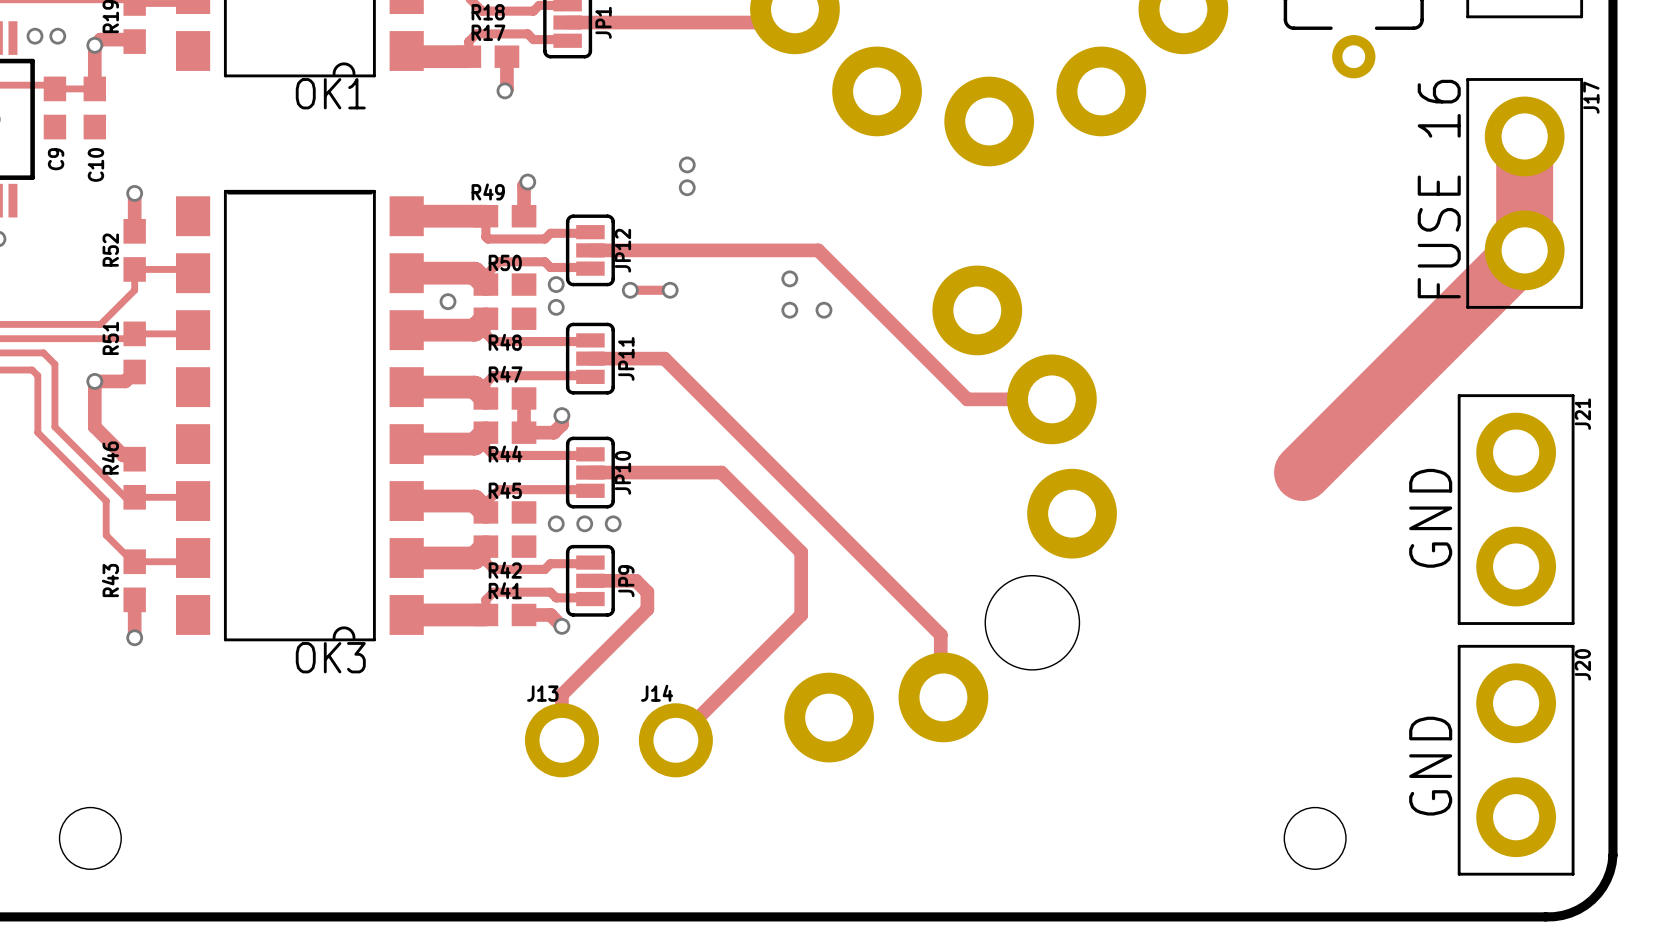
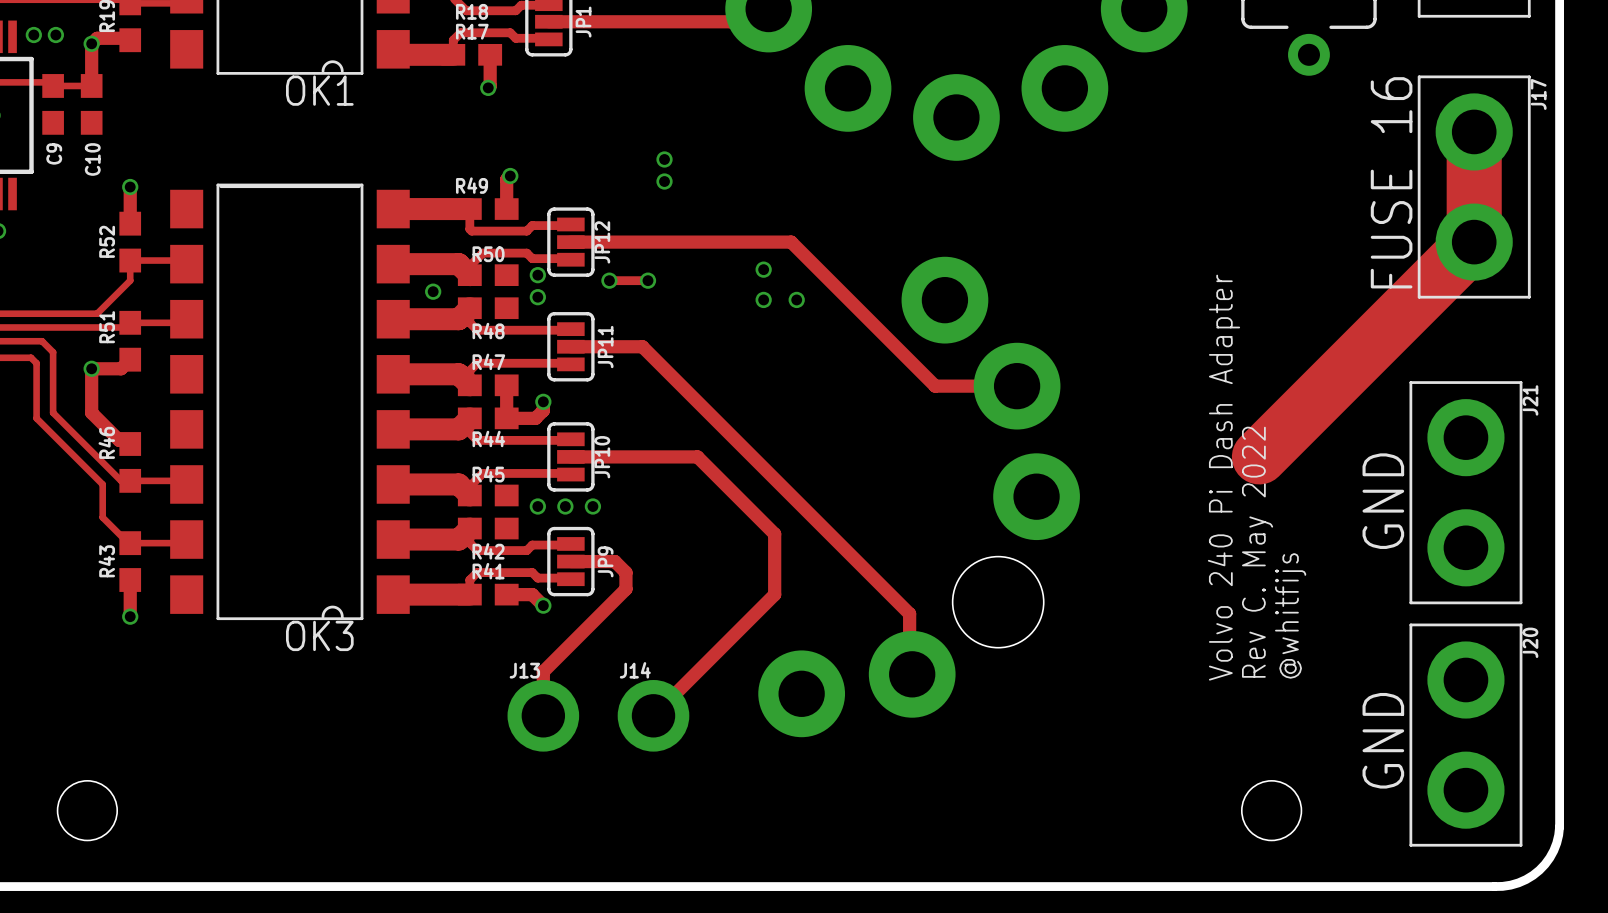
text: none -> Volvo 240 Pi Dash Adapter (1223, 477)
text: none -> Rev C. May 2022 (1257, 552)
text: none -> @whitfijs (1290, 615)

